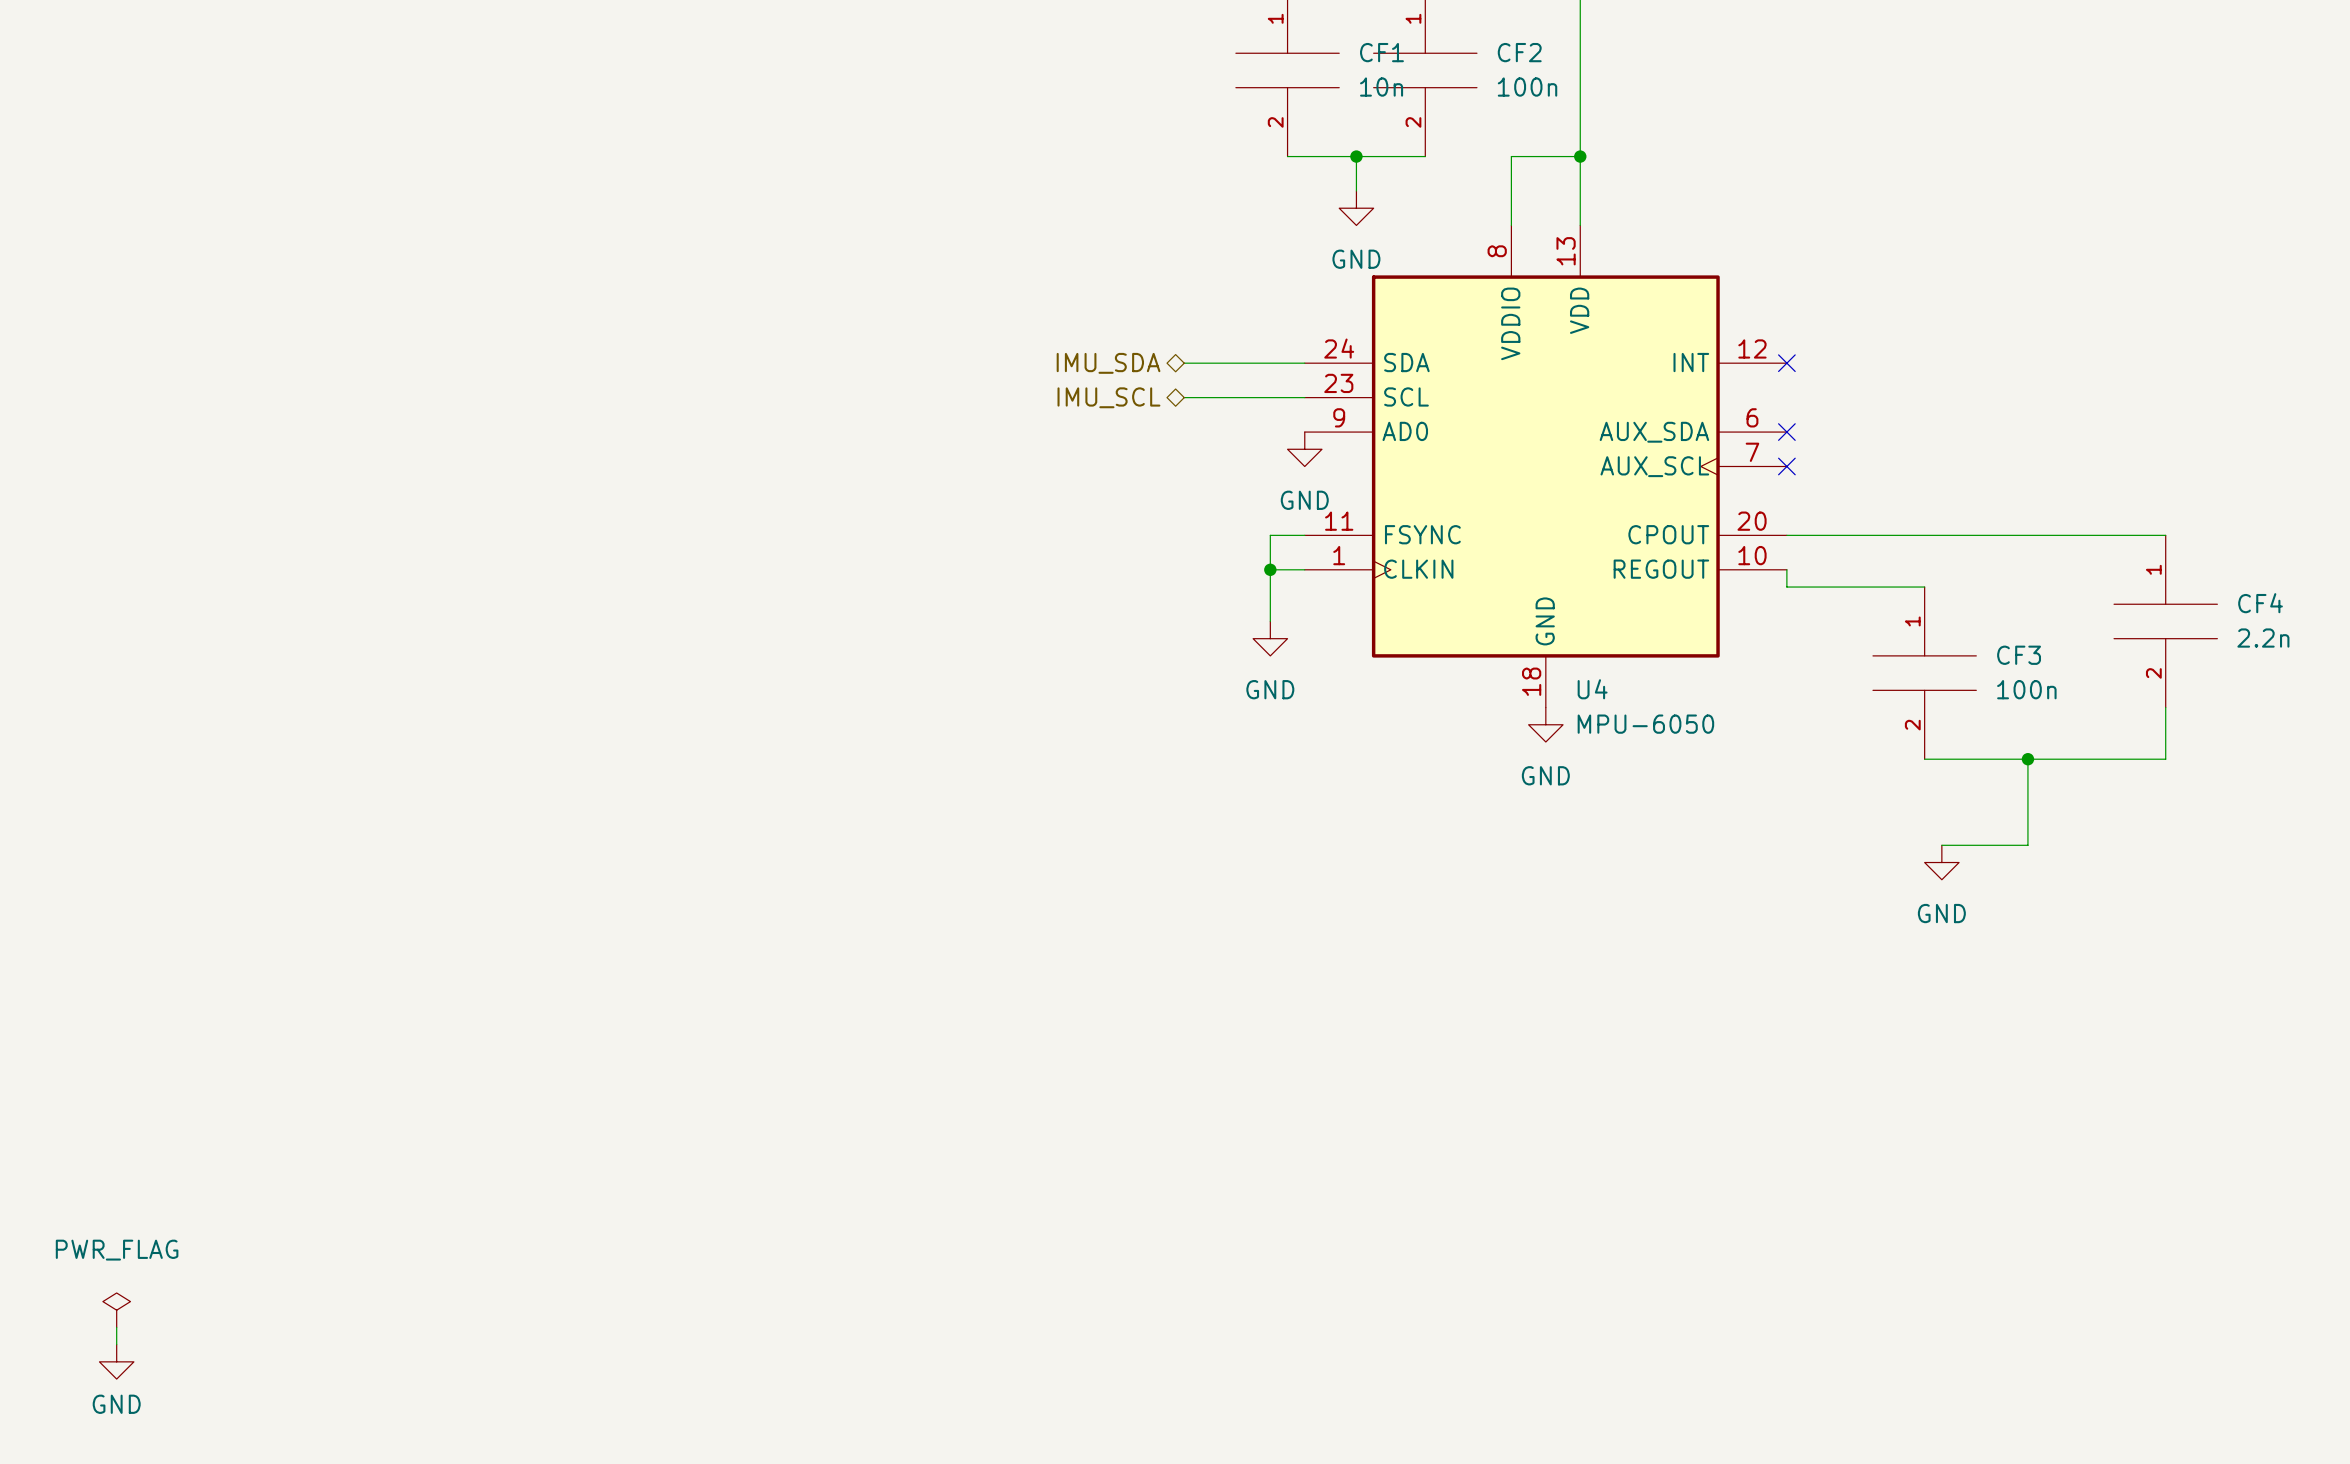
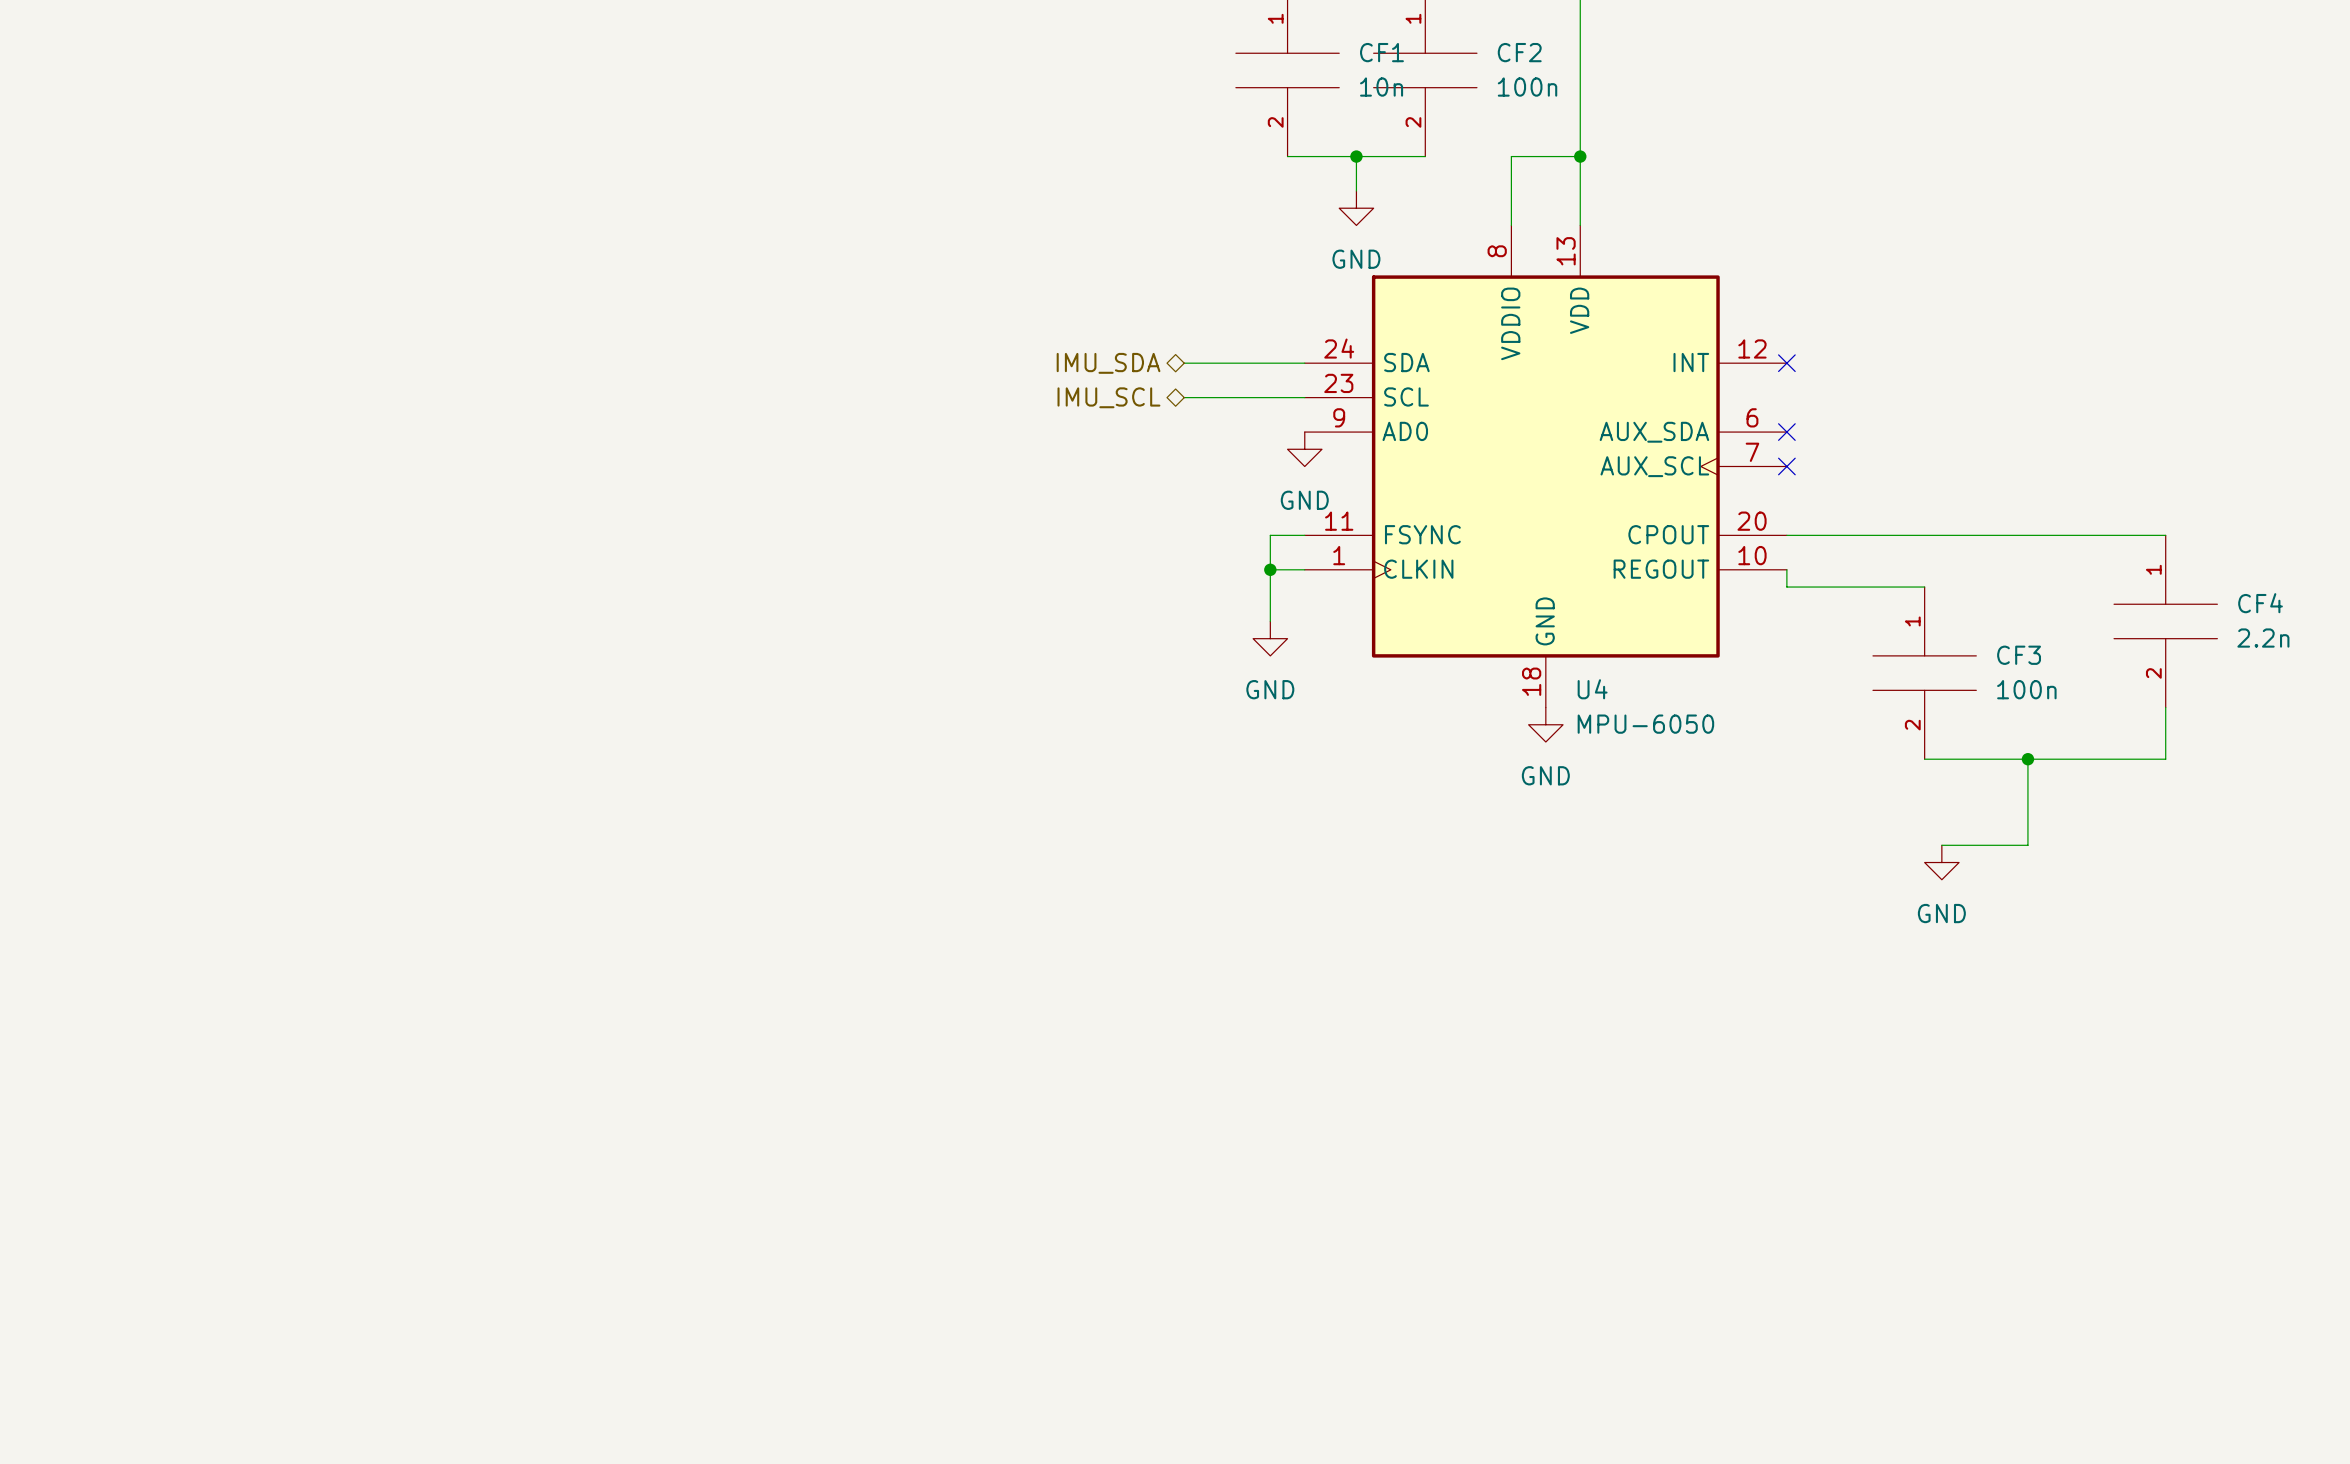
power symbol: PWR_FLAG (116, 1310) -> none
wire: (116, 1327) (116, 1344) -> none
power symbol: GND (116, 1361) -> none

